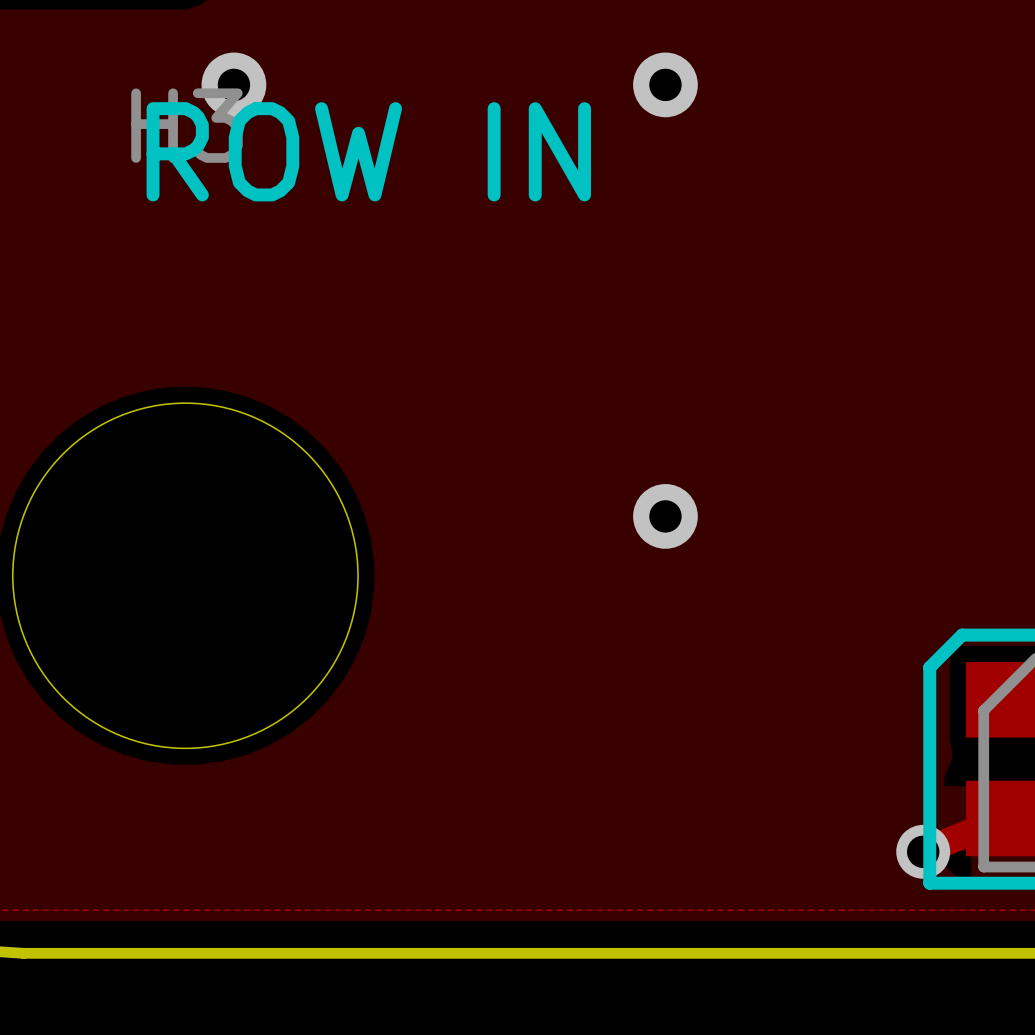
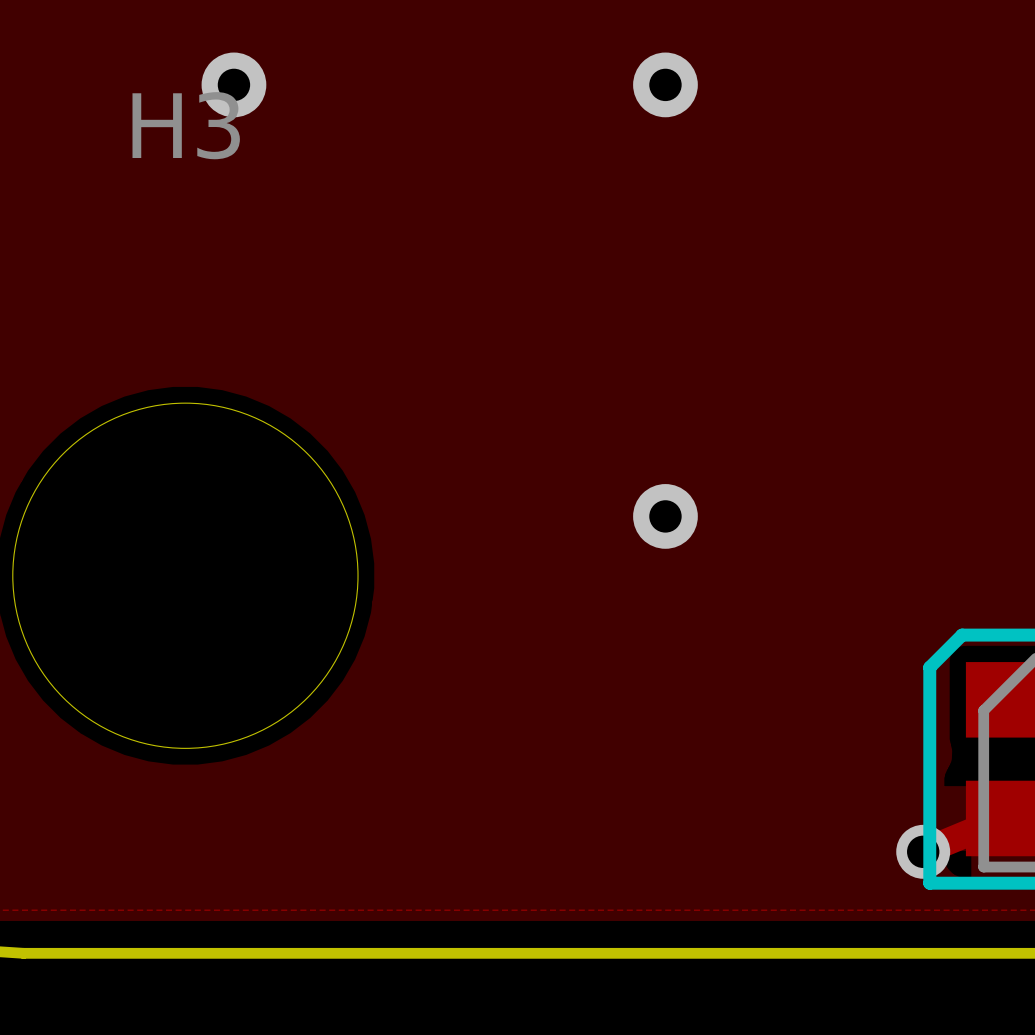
text: ROW IN (368, 151) -> none

